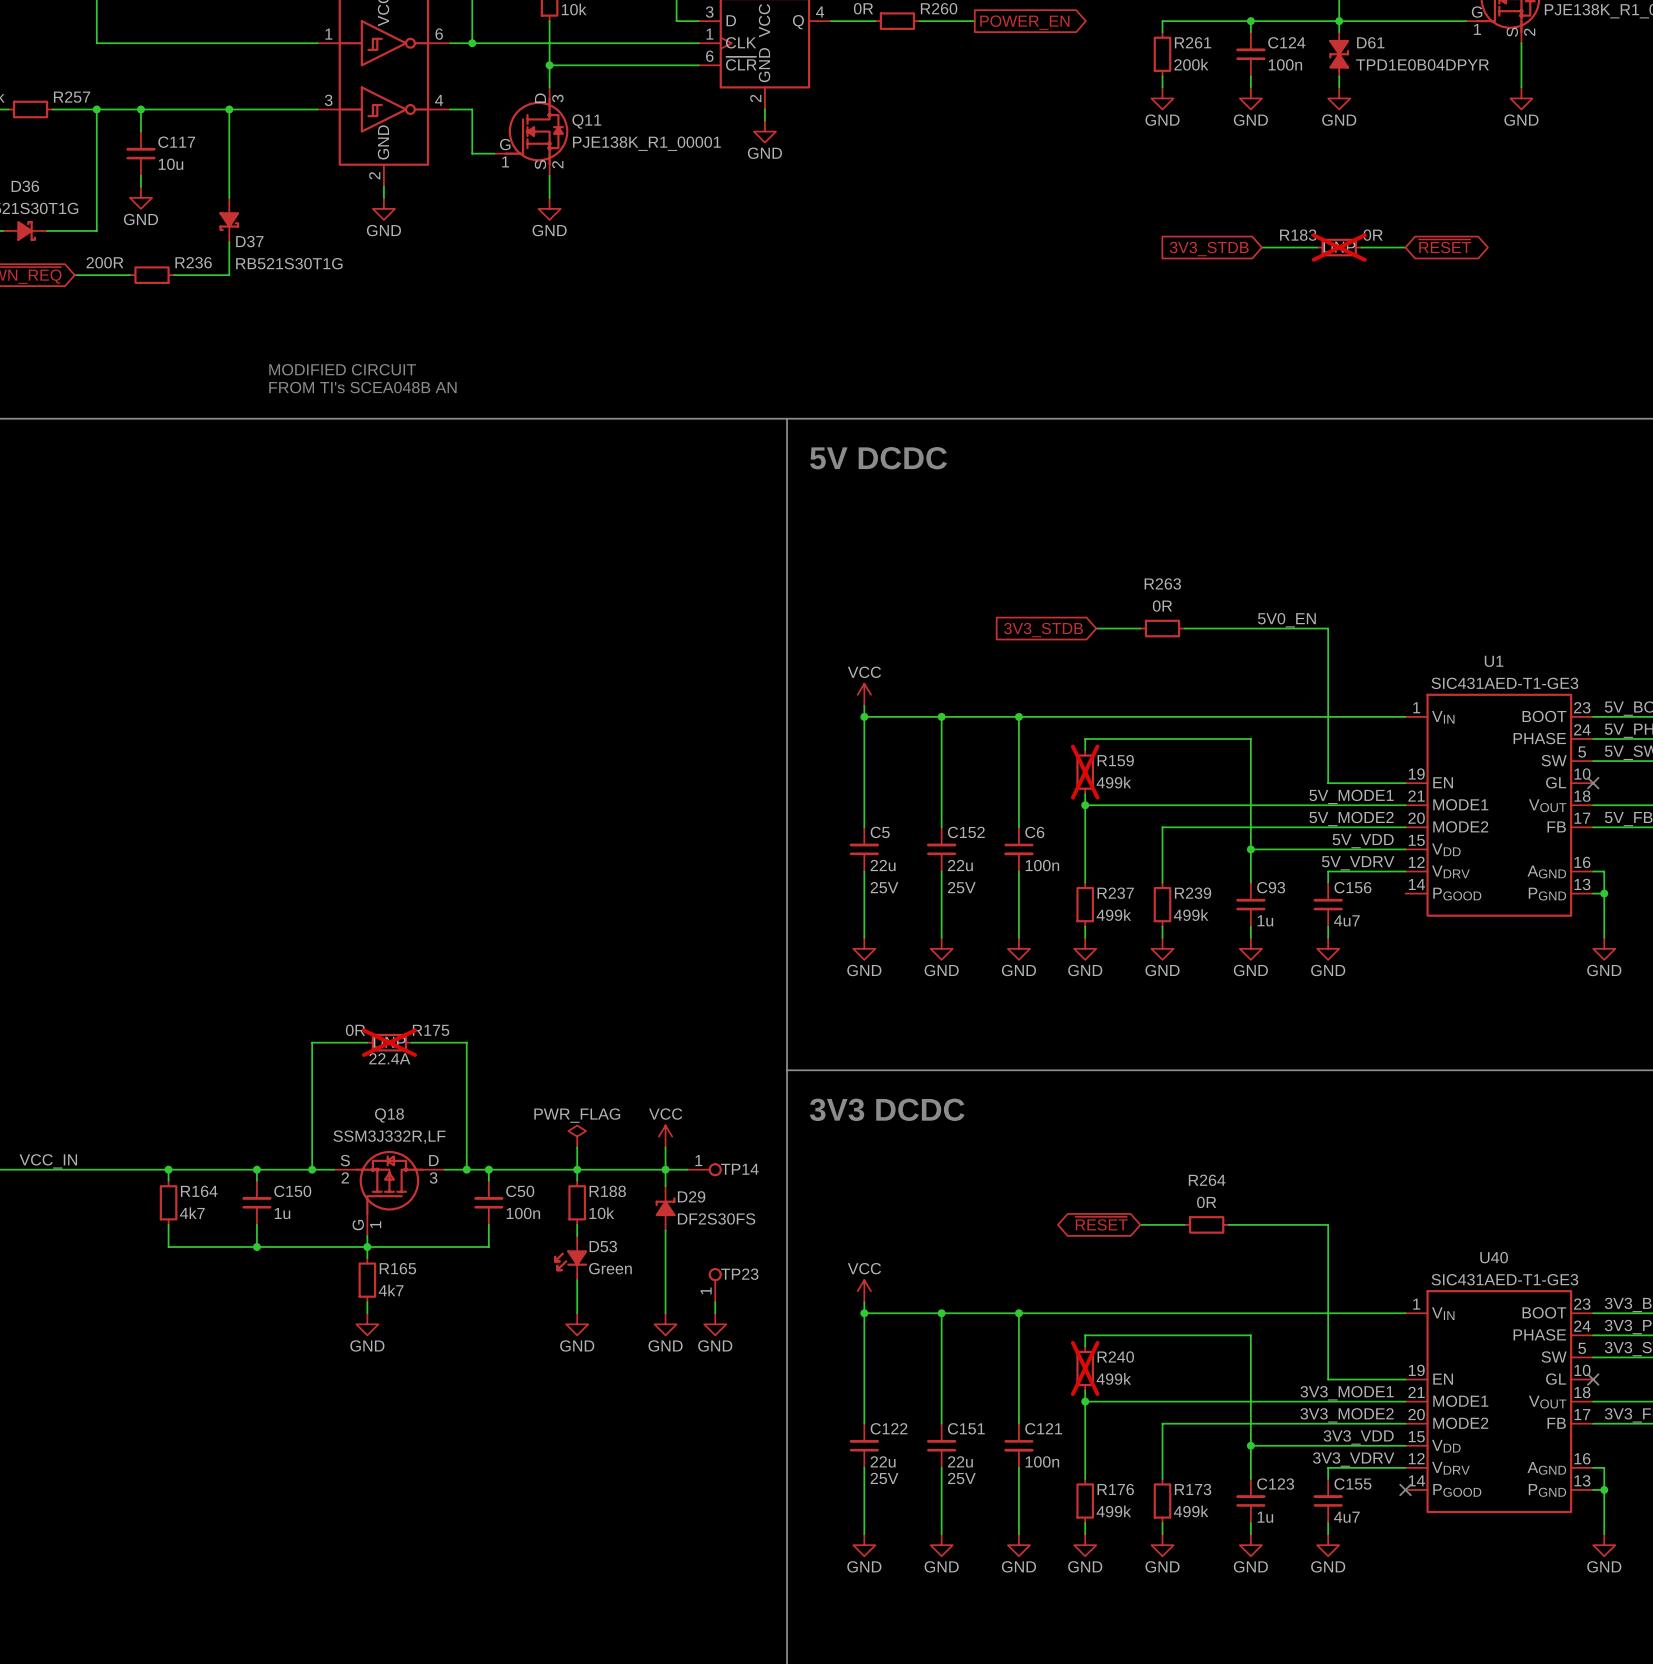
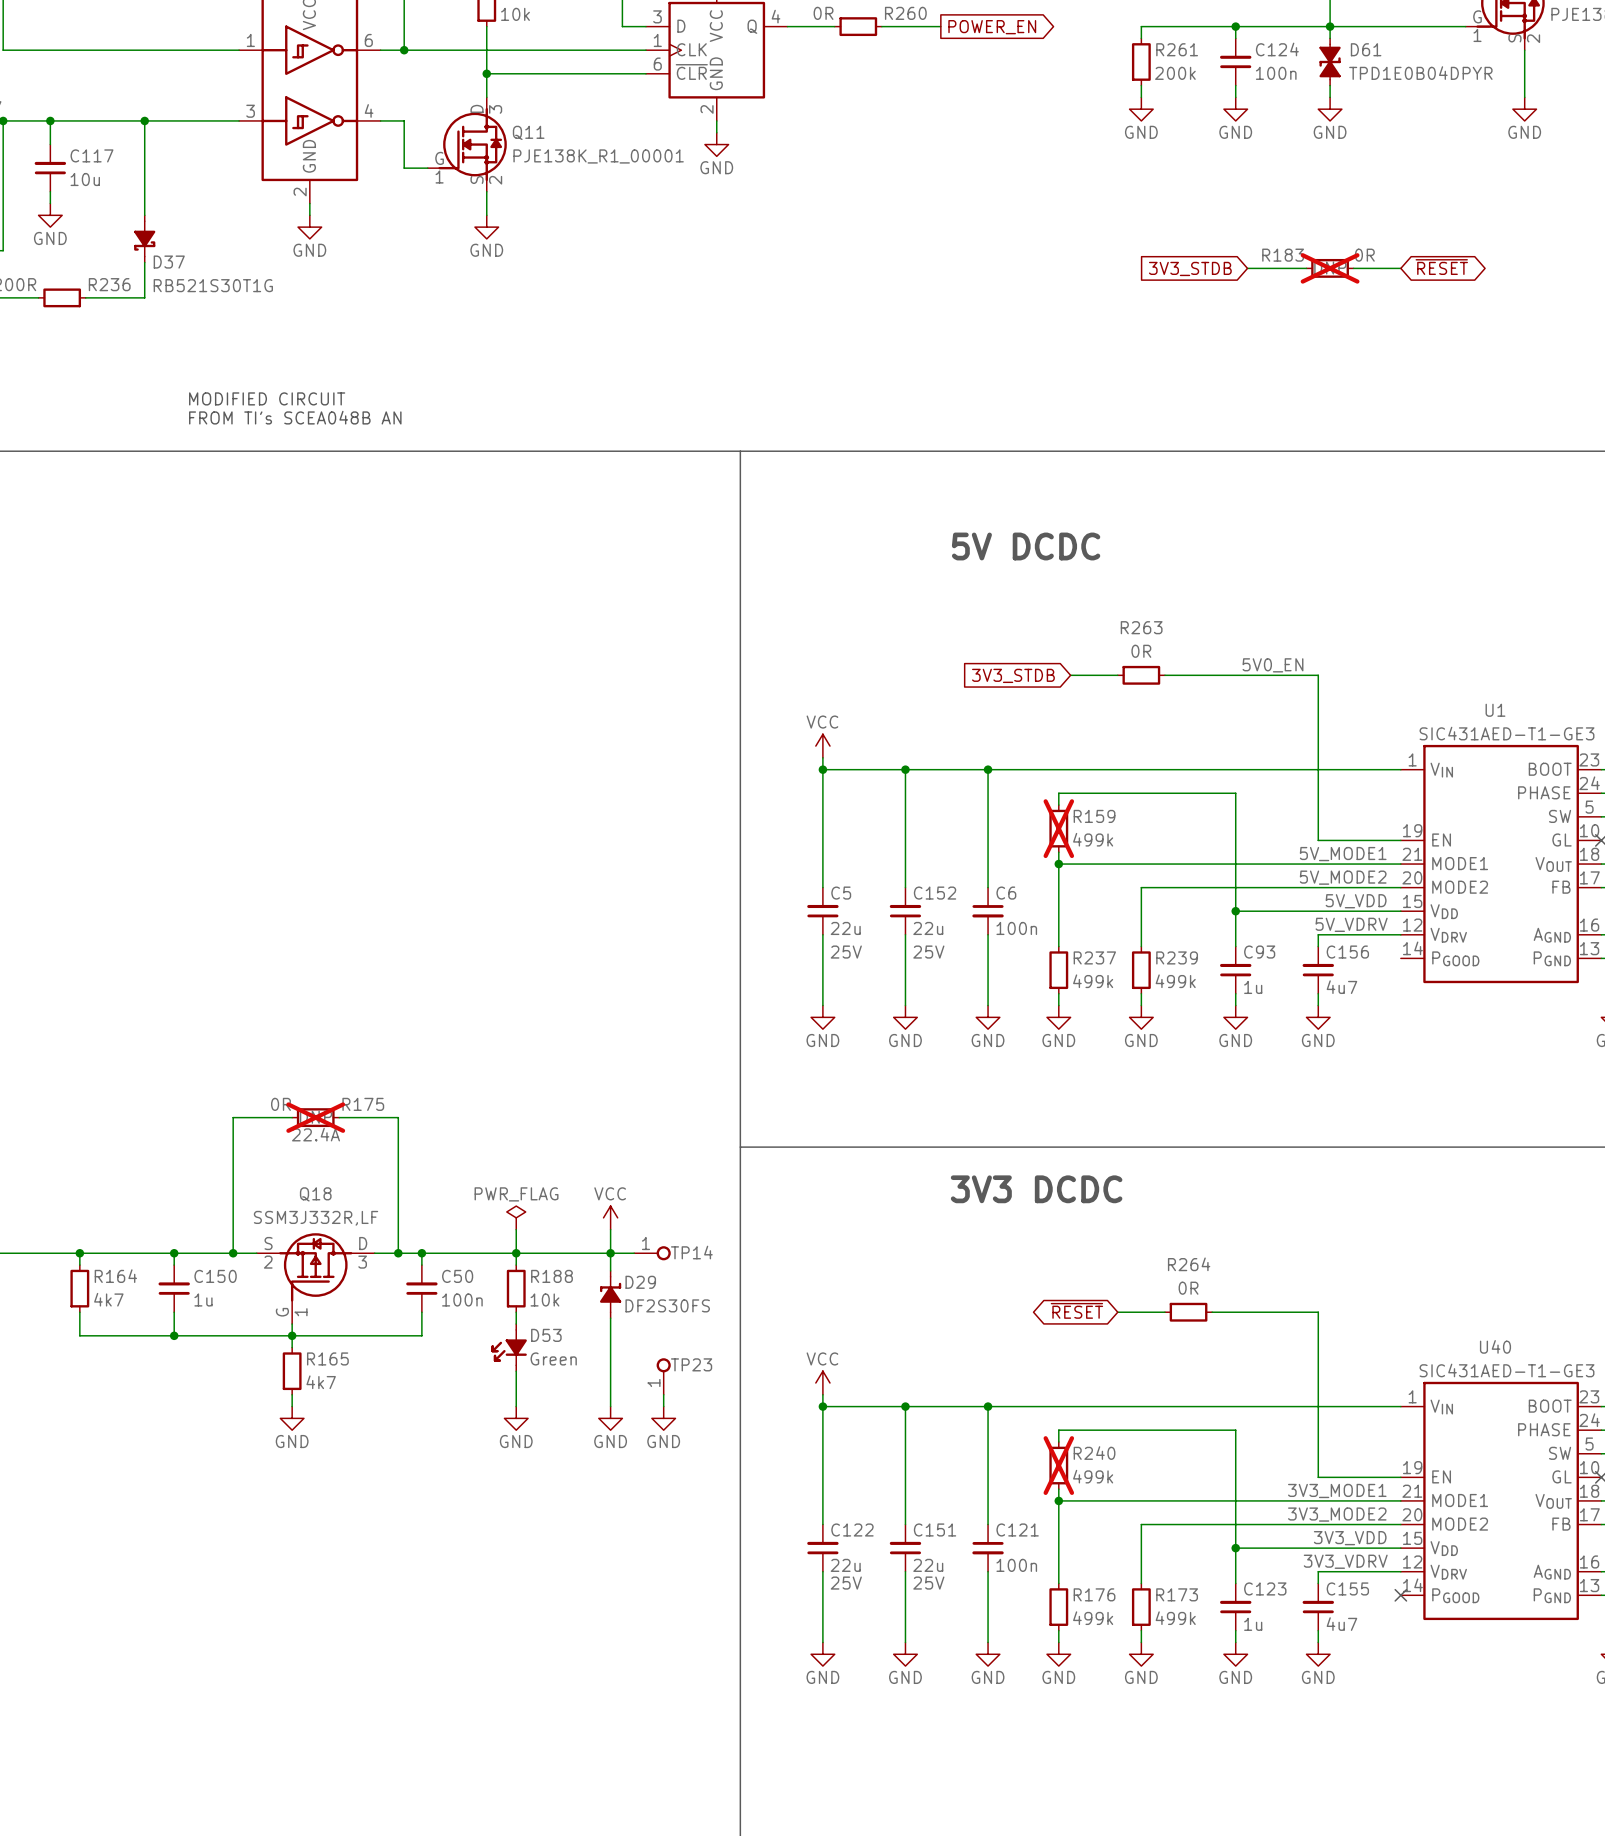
text position: 5V DCDC (878, 458) -> 5V DCDC (1026, 546)
text position: 3V3 DCDC (887, 1109) -> 3V3 DCDC (1036, 1189)

